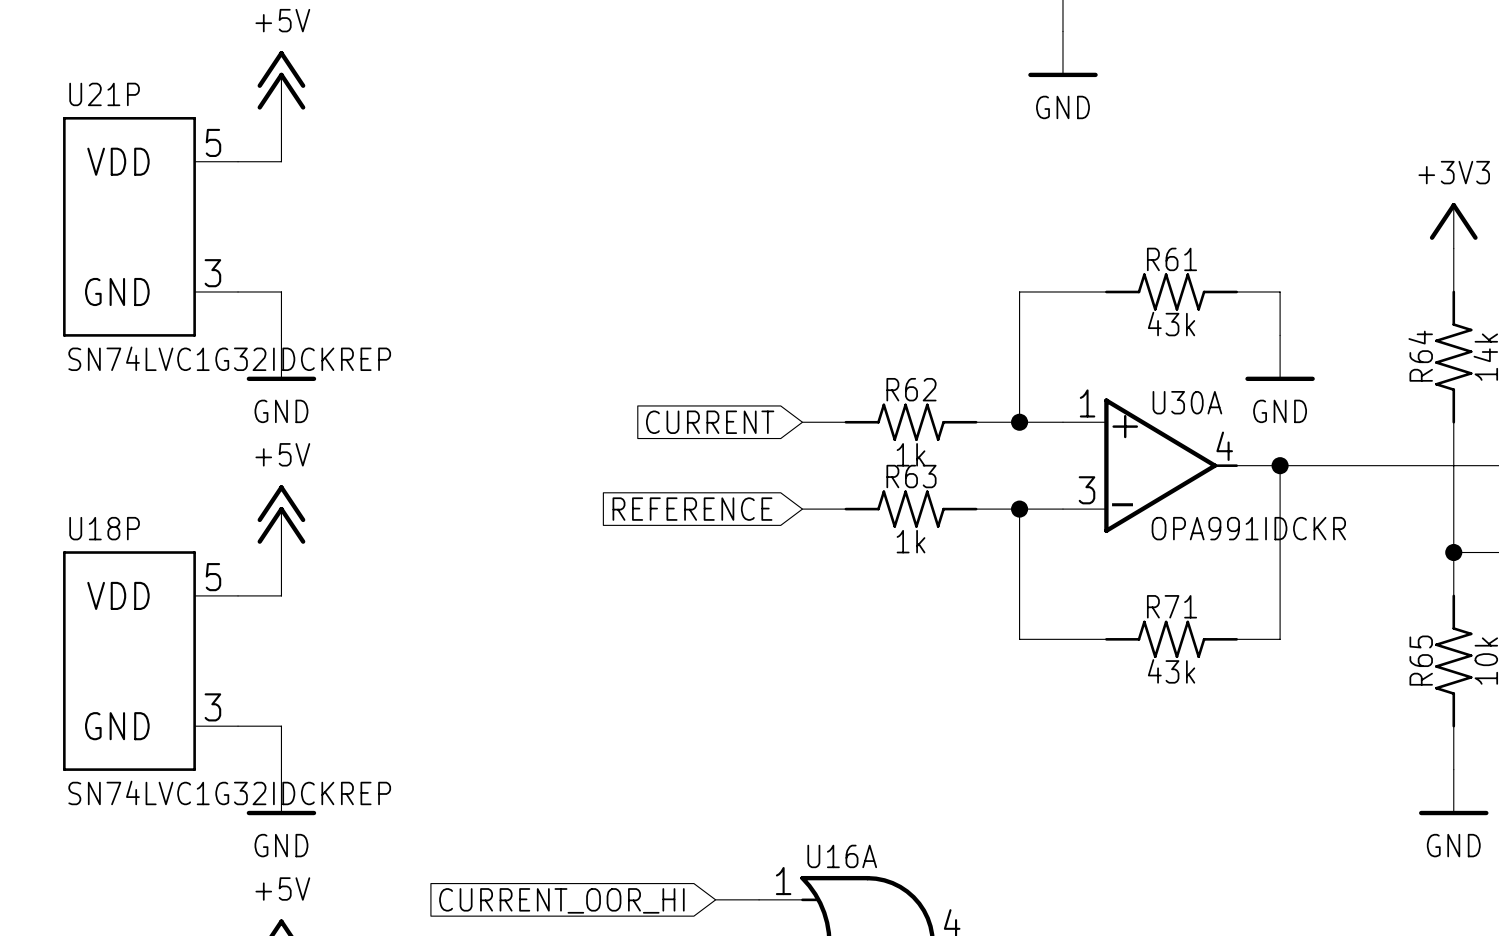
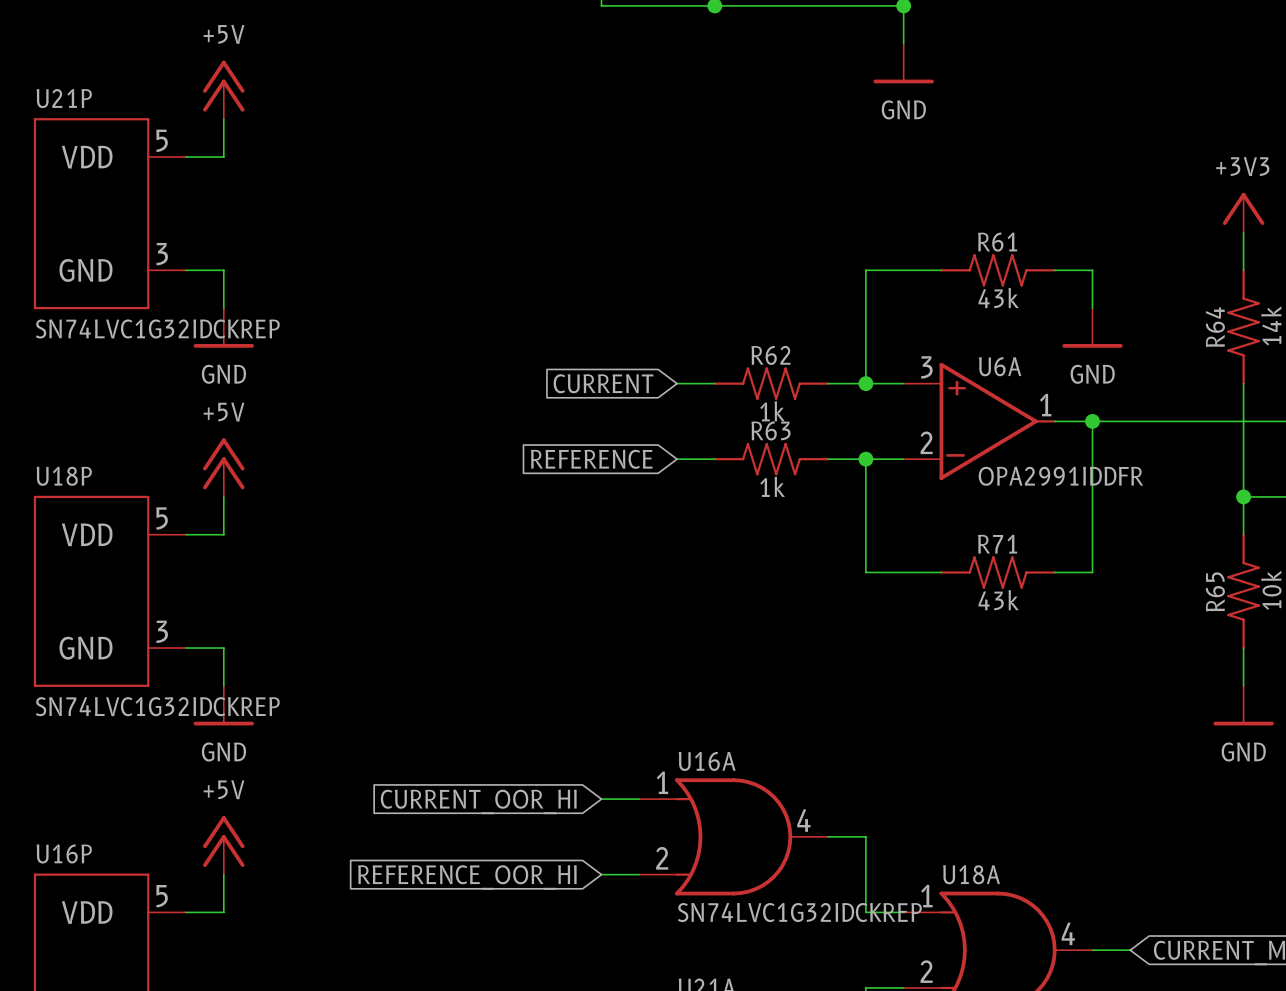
U30A name: U30A (1187, 402) -> U6A (1000, 366)
U30A pin number: 1 (1087, 403) -> 3 (926, 367)
U30A pin number: 4 (1224, 446) -> 1 (1045, 405)
U30A pin number: 3 (1086, 490) -> 2 (926, 442)
U30A text: OPA991IDCKR (1248, 528) -> OPA2991IDDFR (1060, 476)

